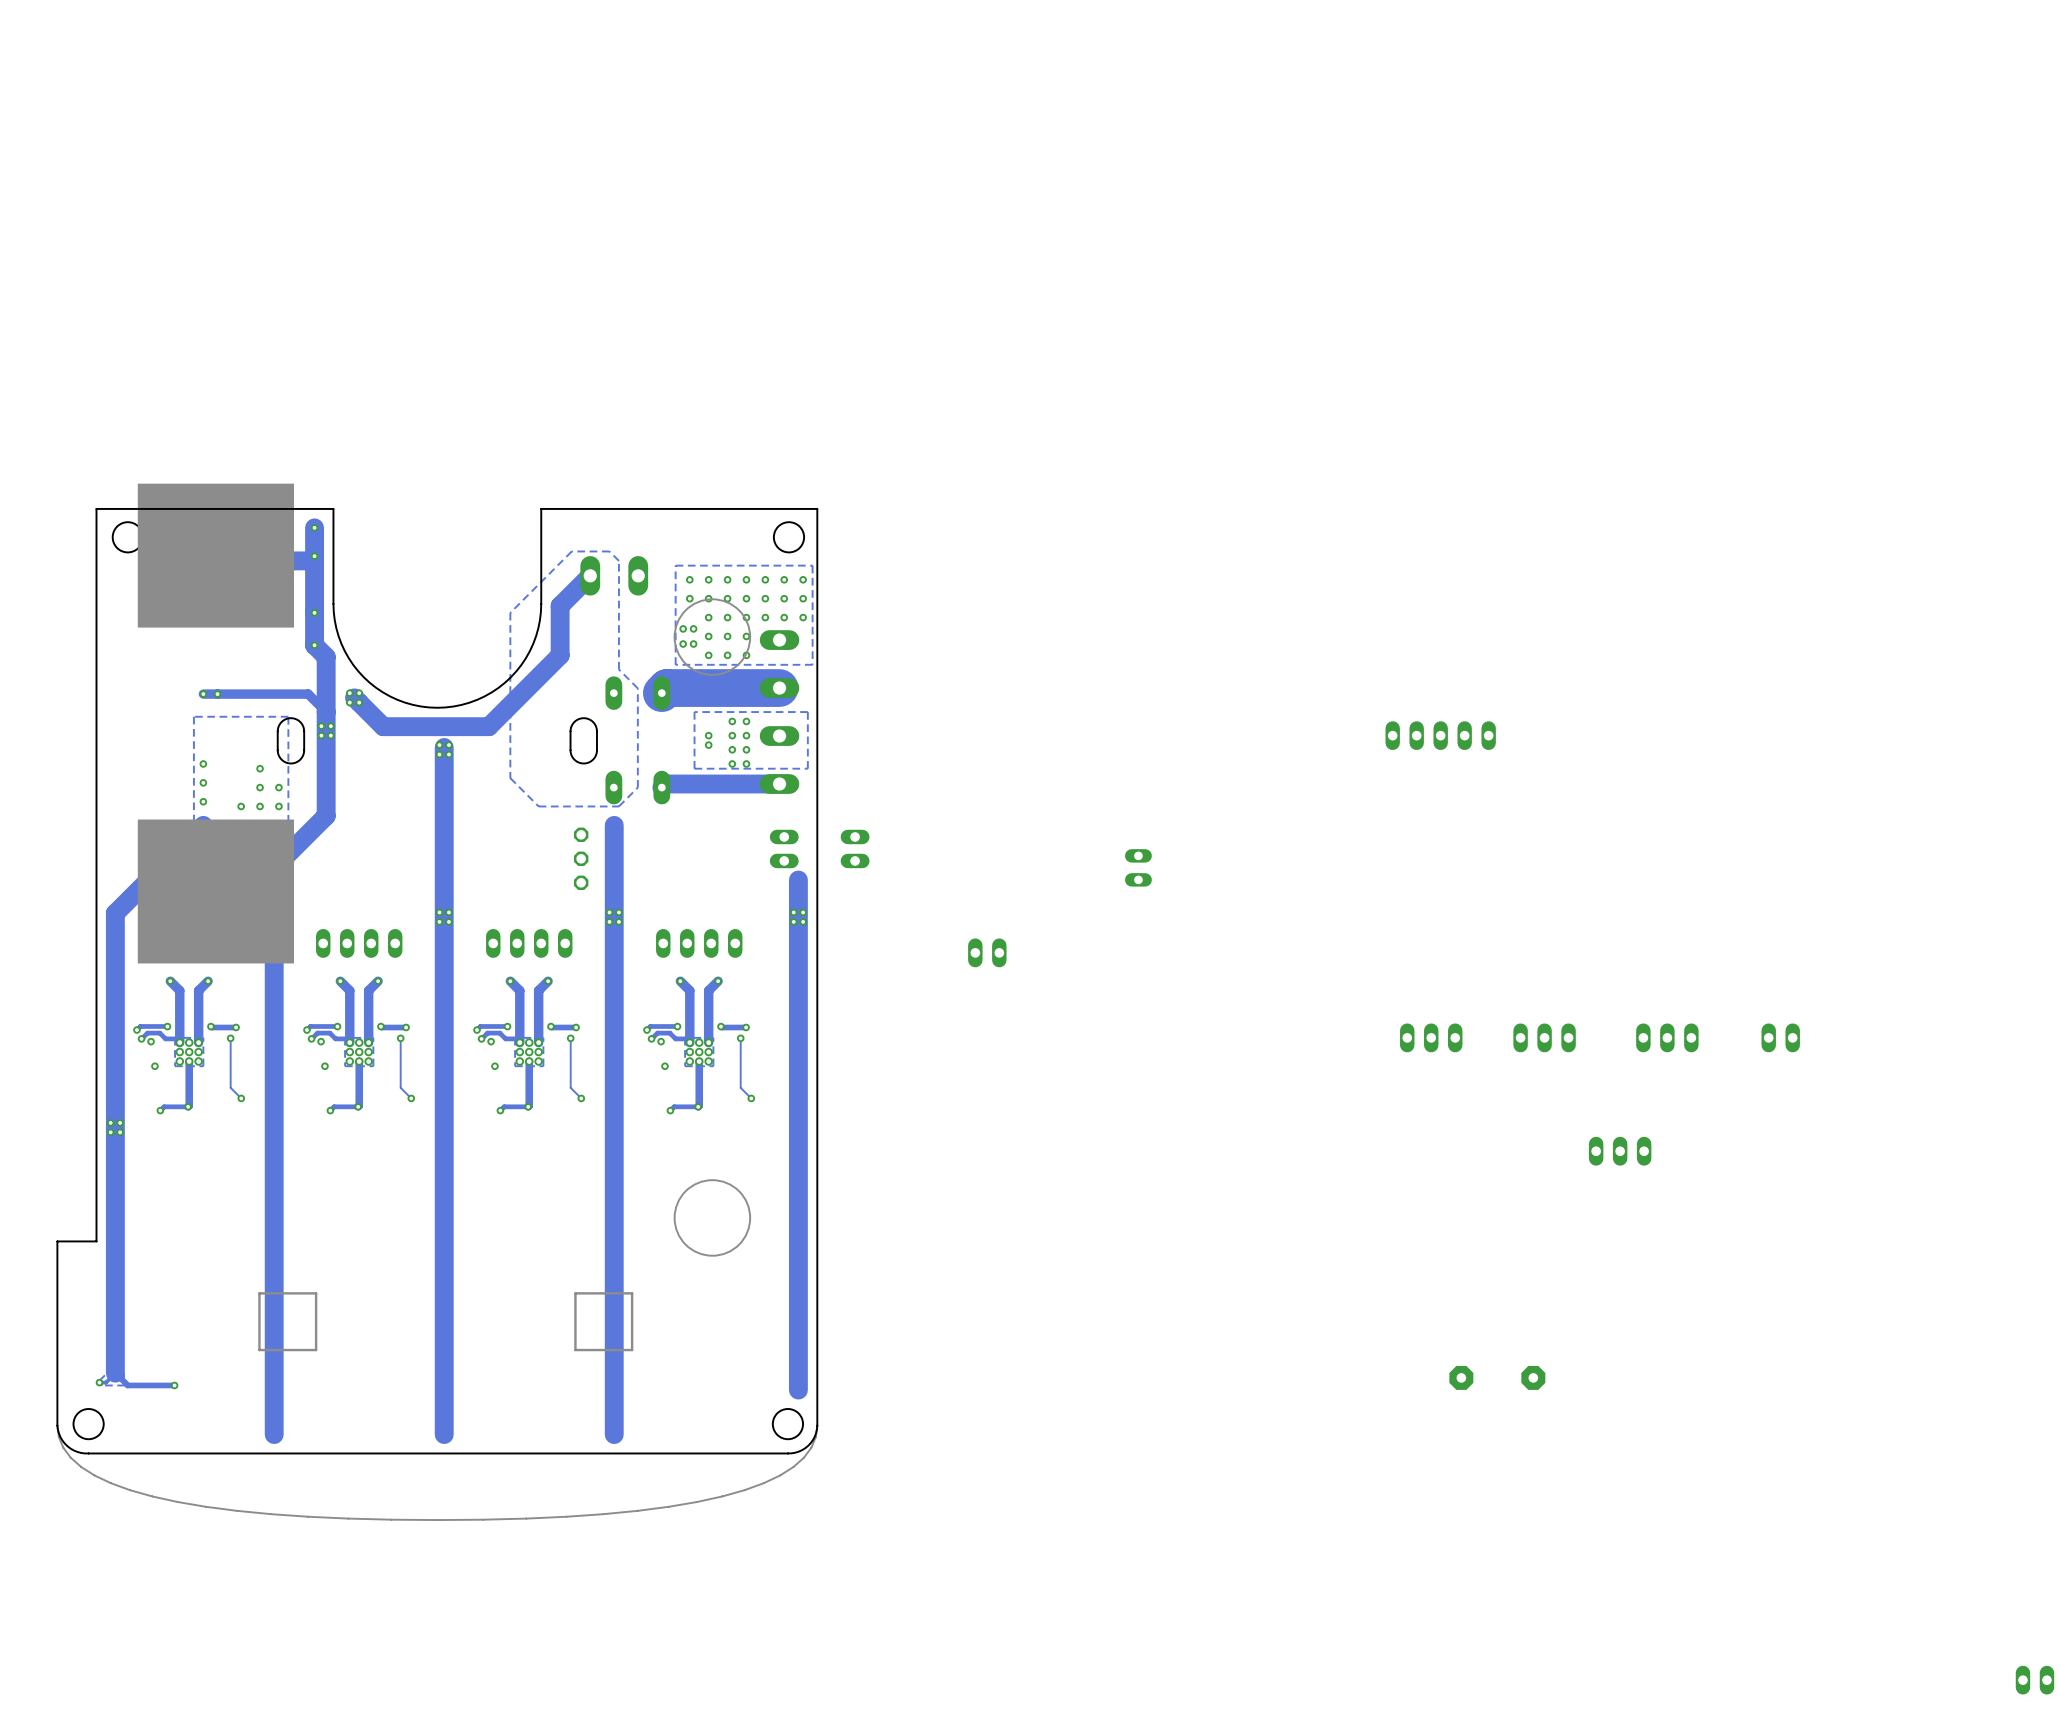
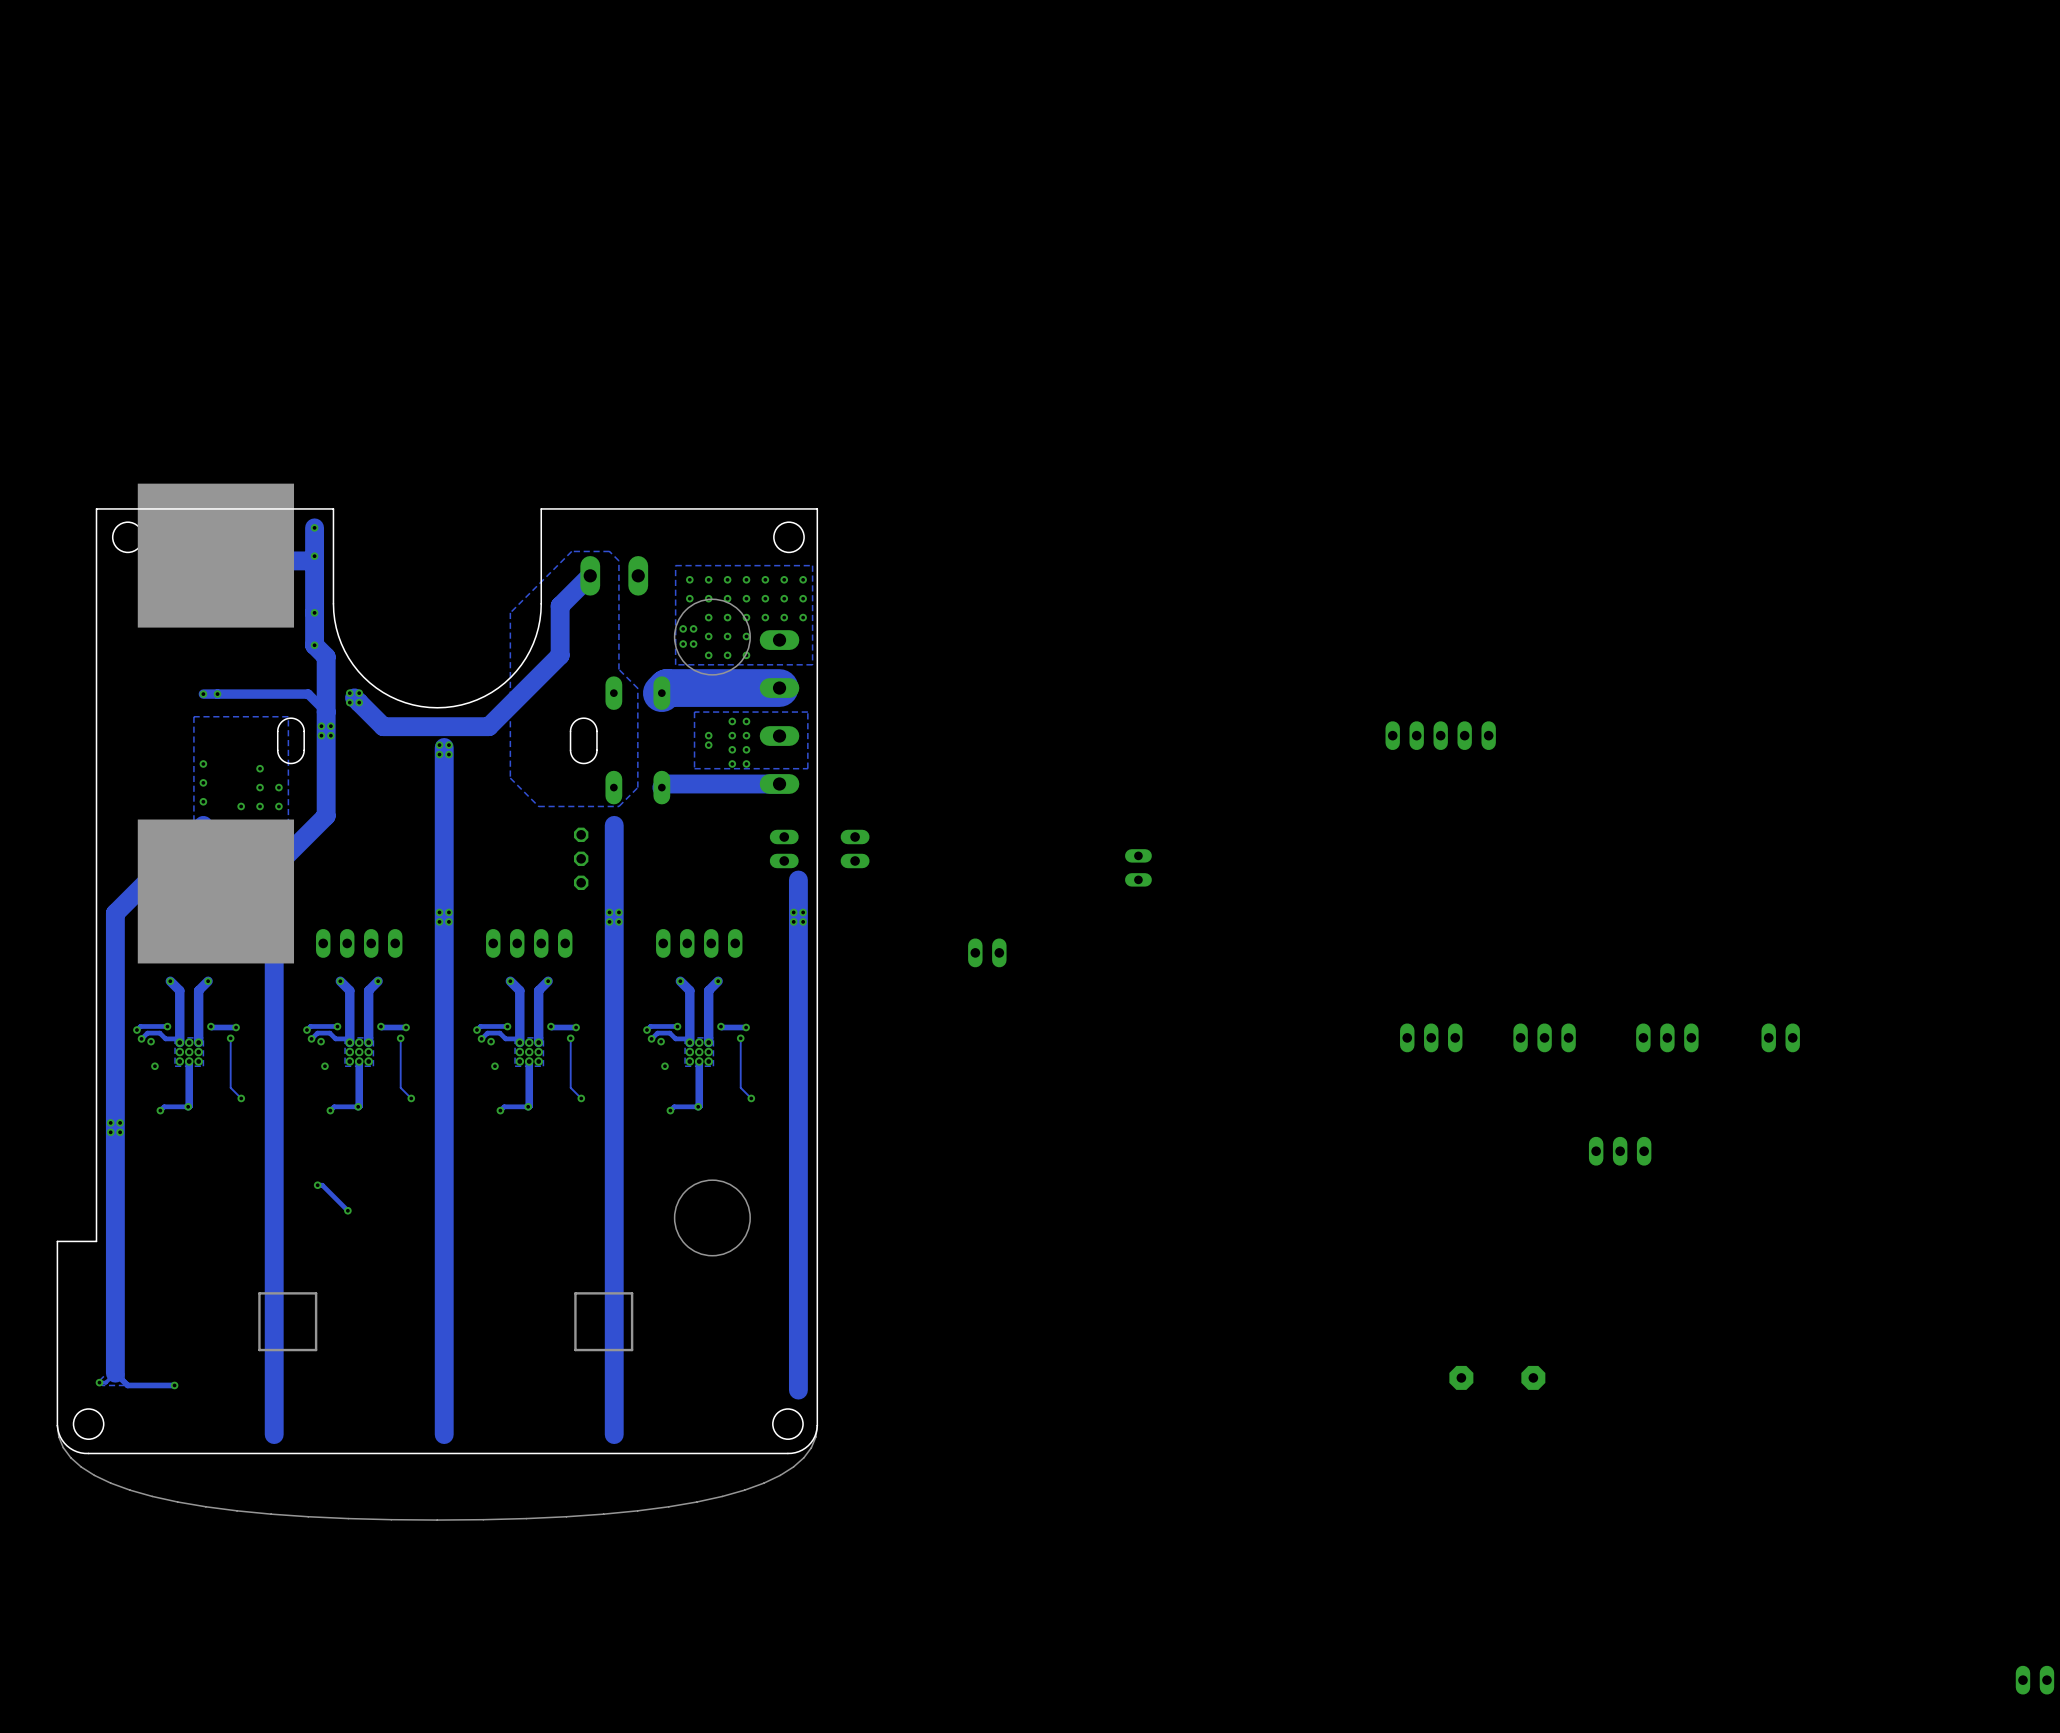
track: none -> (317, 1185) (322, 1185) (347, 1210)
via: none -> (317, 1185)
via: none -> (347, 1210)

